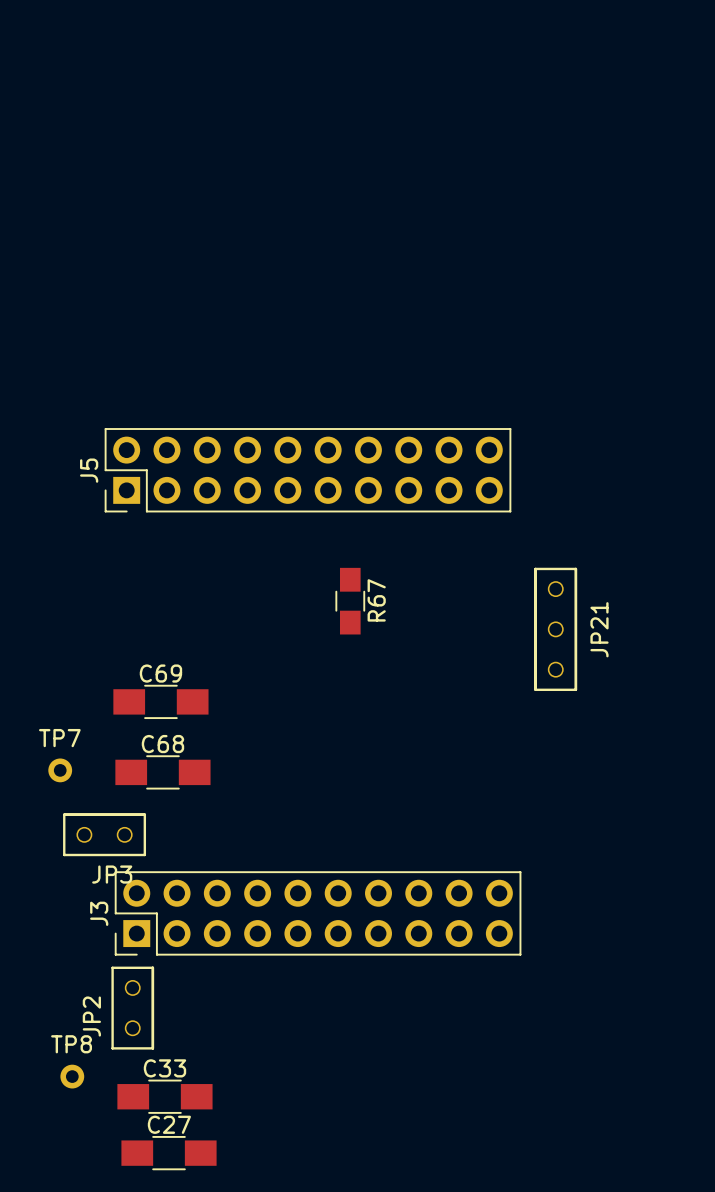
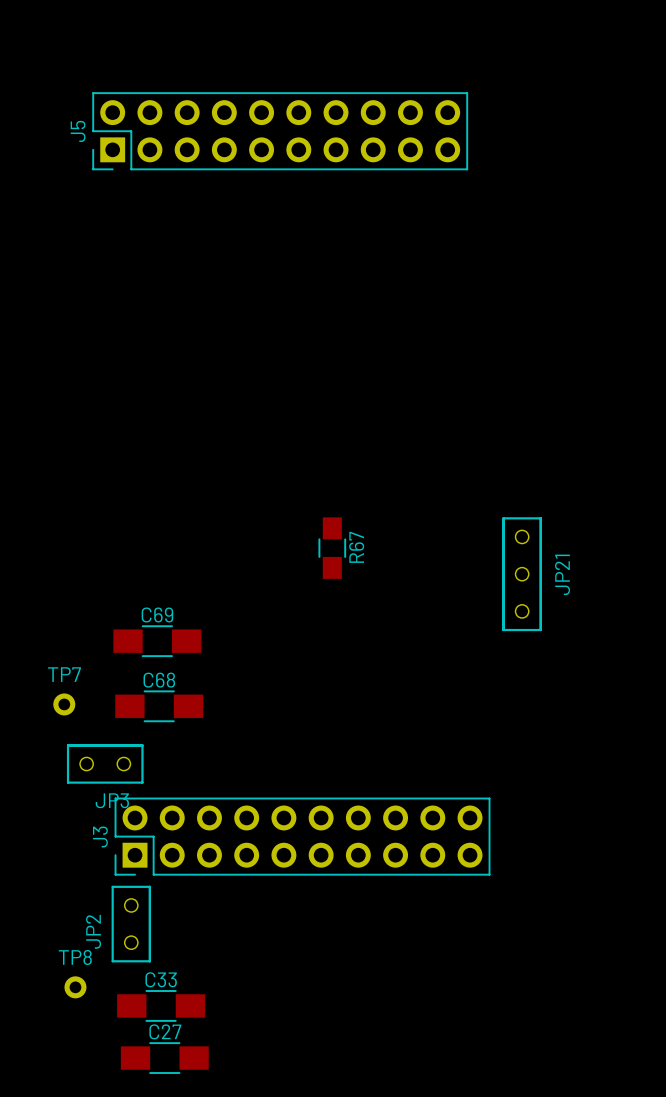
J5 position: (307, 470) -> (280, 131)

